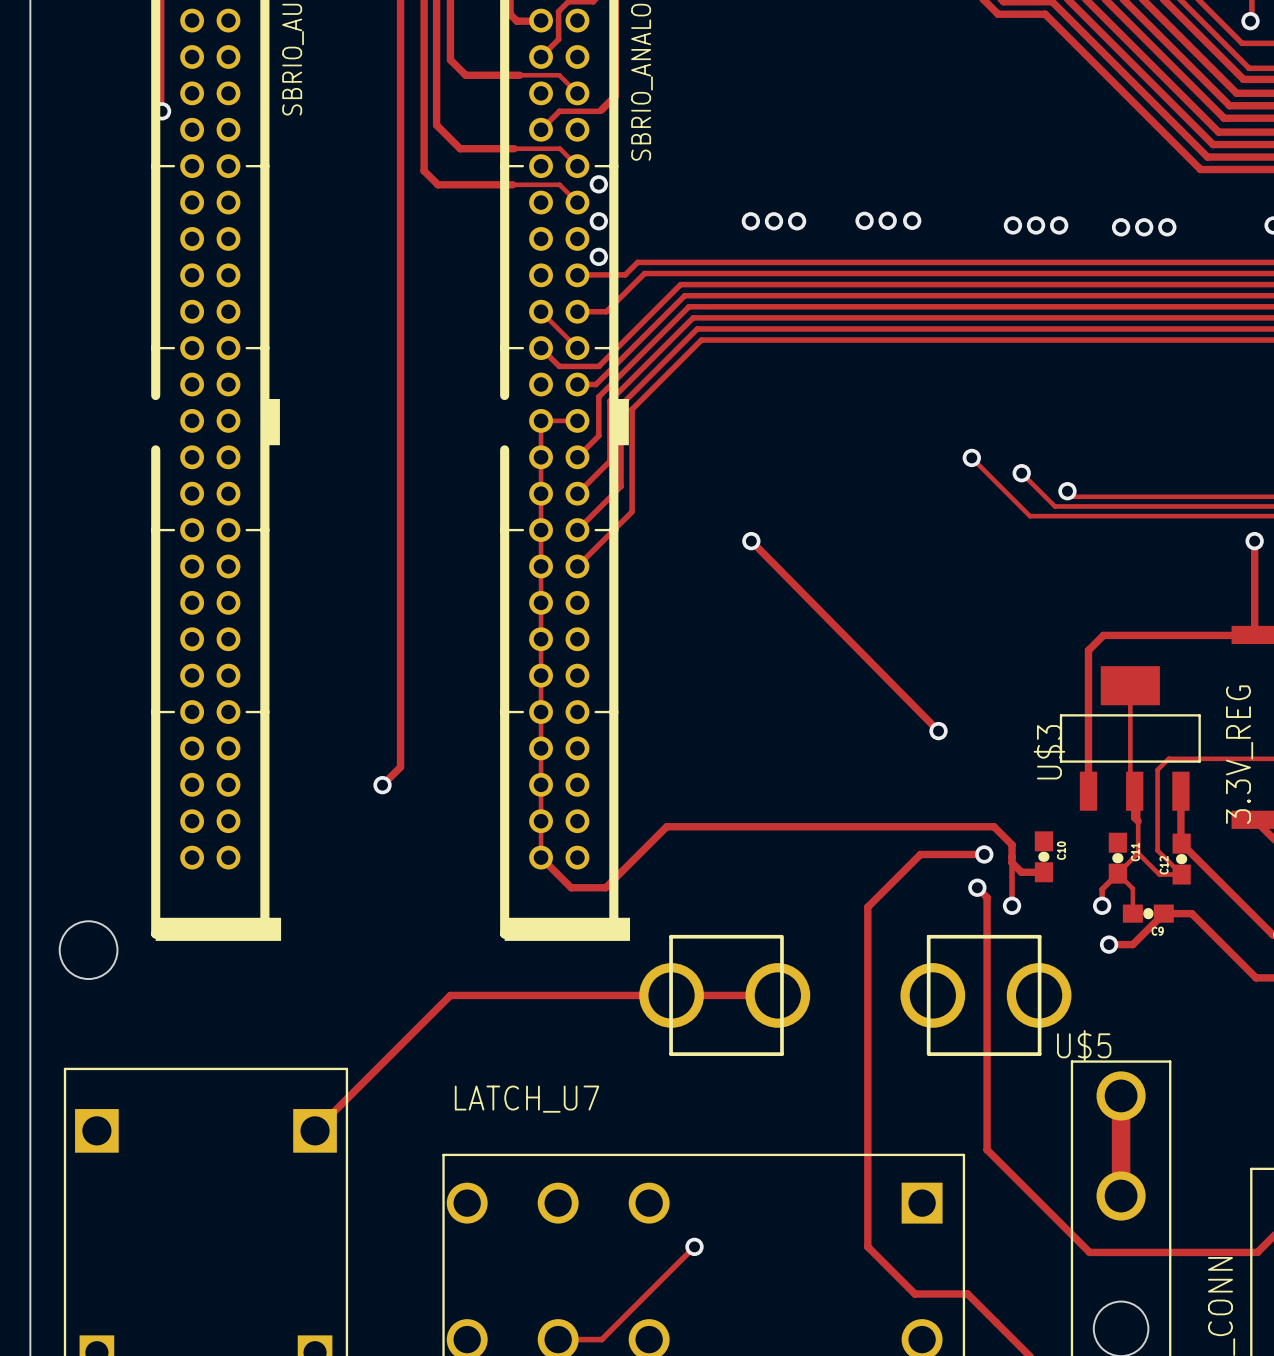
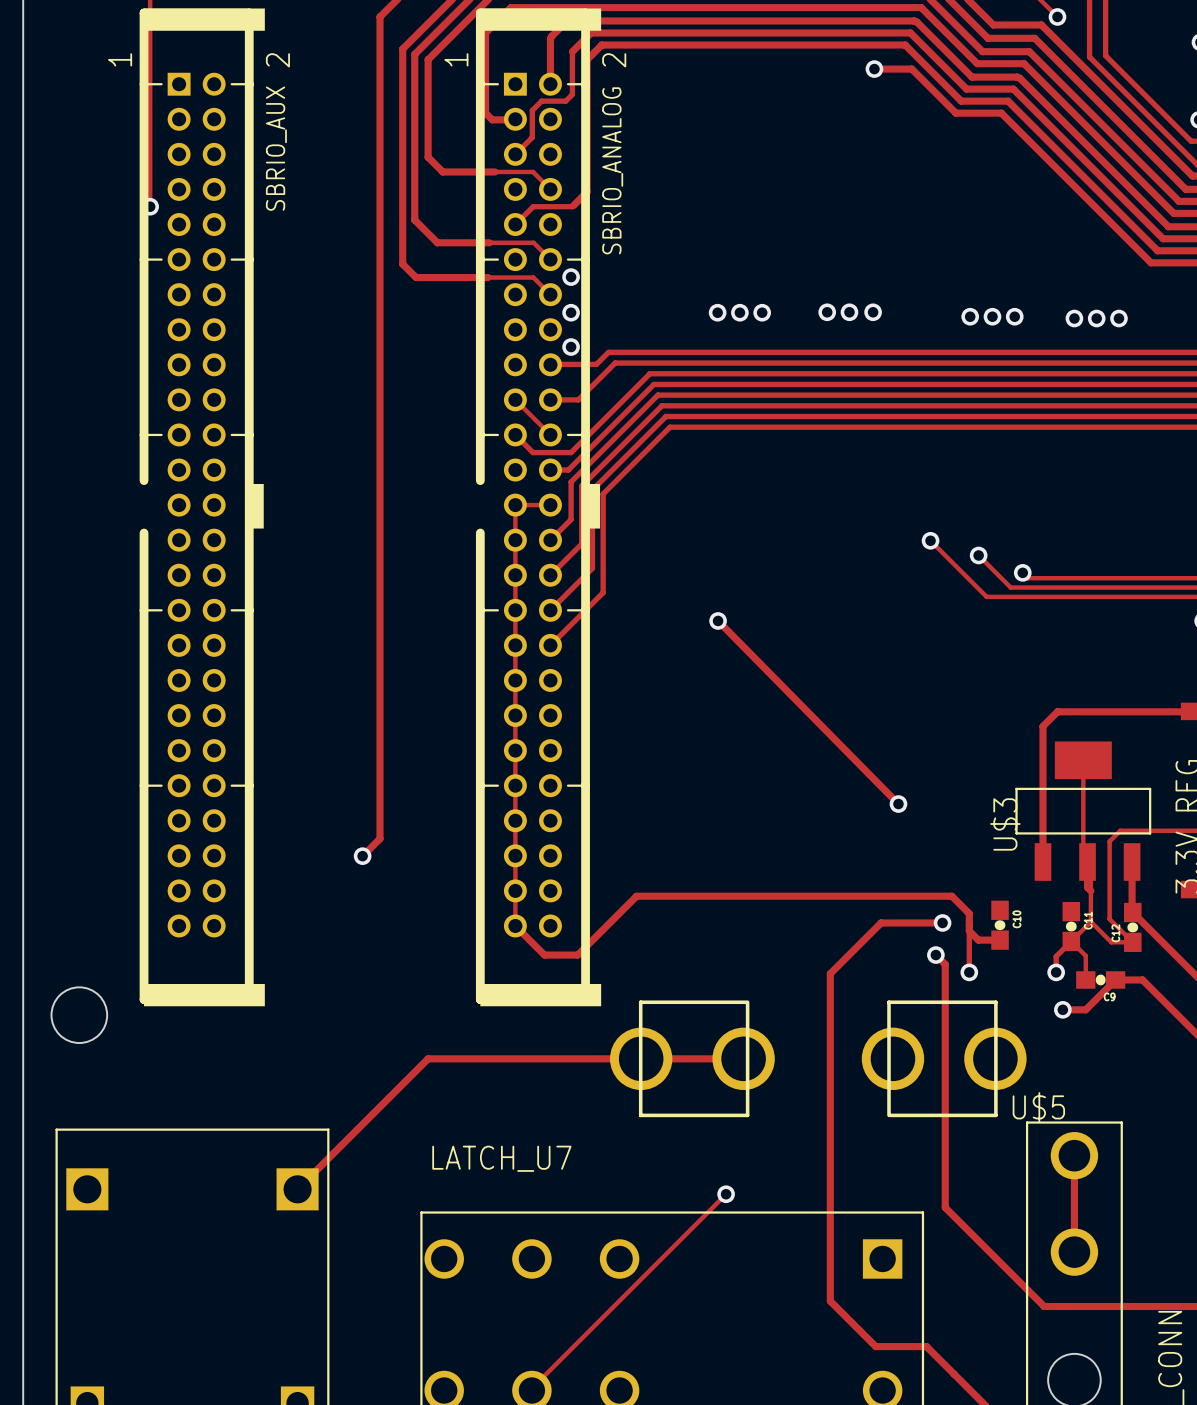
track width: thick (1121, 1095) (1121, 1196) -> thin (1074, 1155) (1074, 1252)
via: none -> (726, 1194)
track: (694, 1246) (601, 1339) (558, 1339) -> (726, 1194) (531, 1390)
via: (694, 1246) -> none

